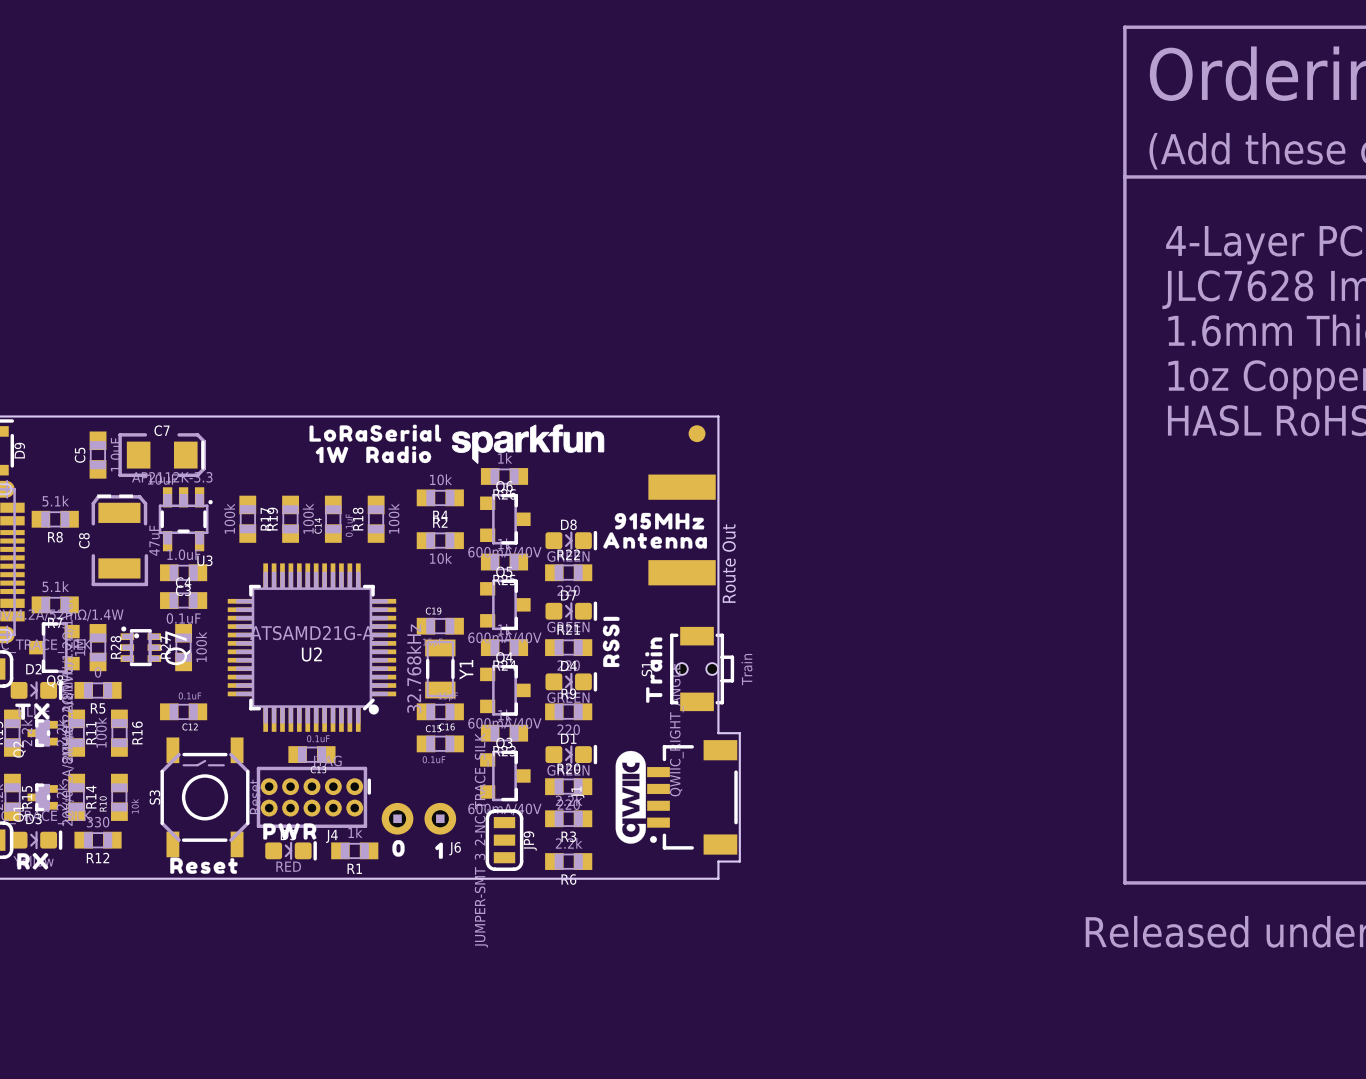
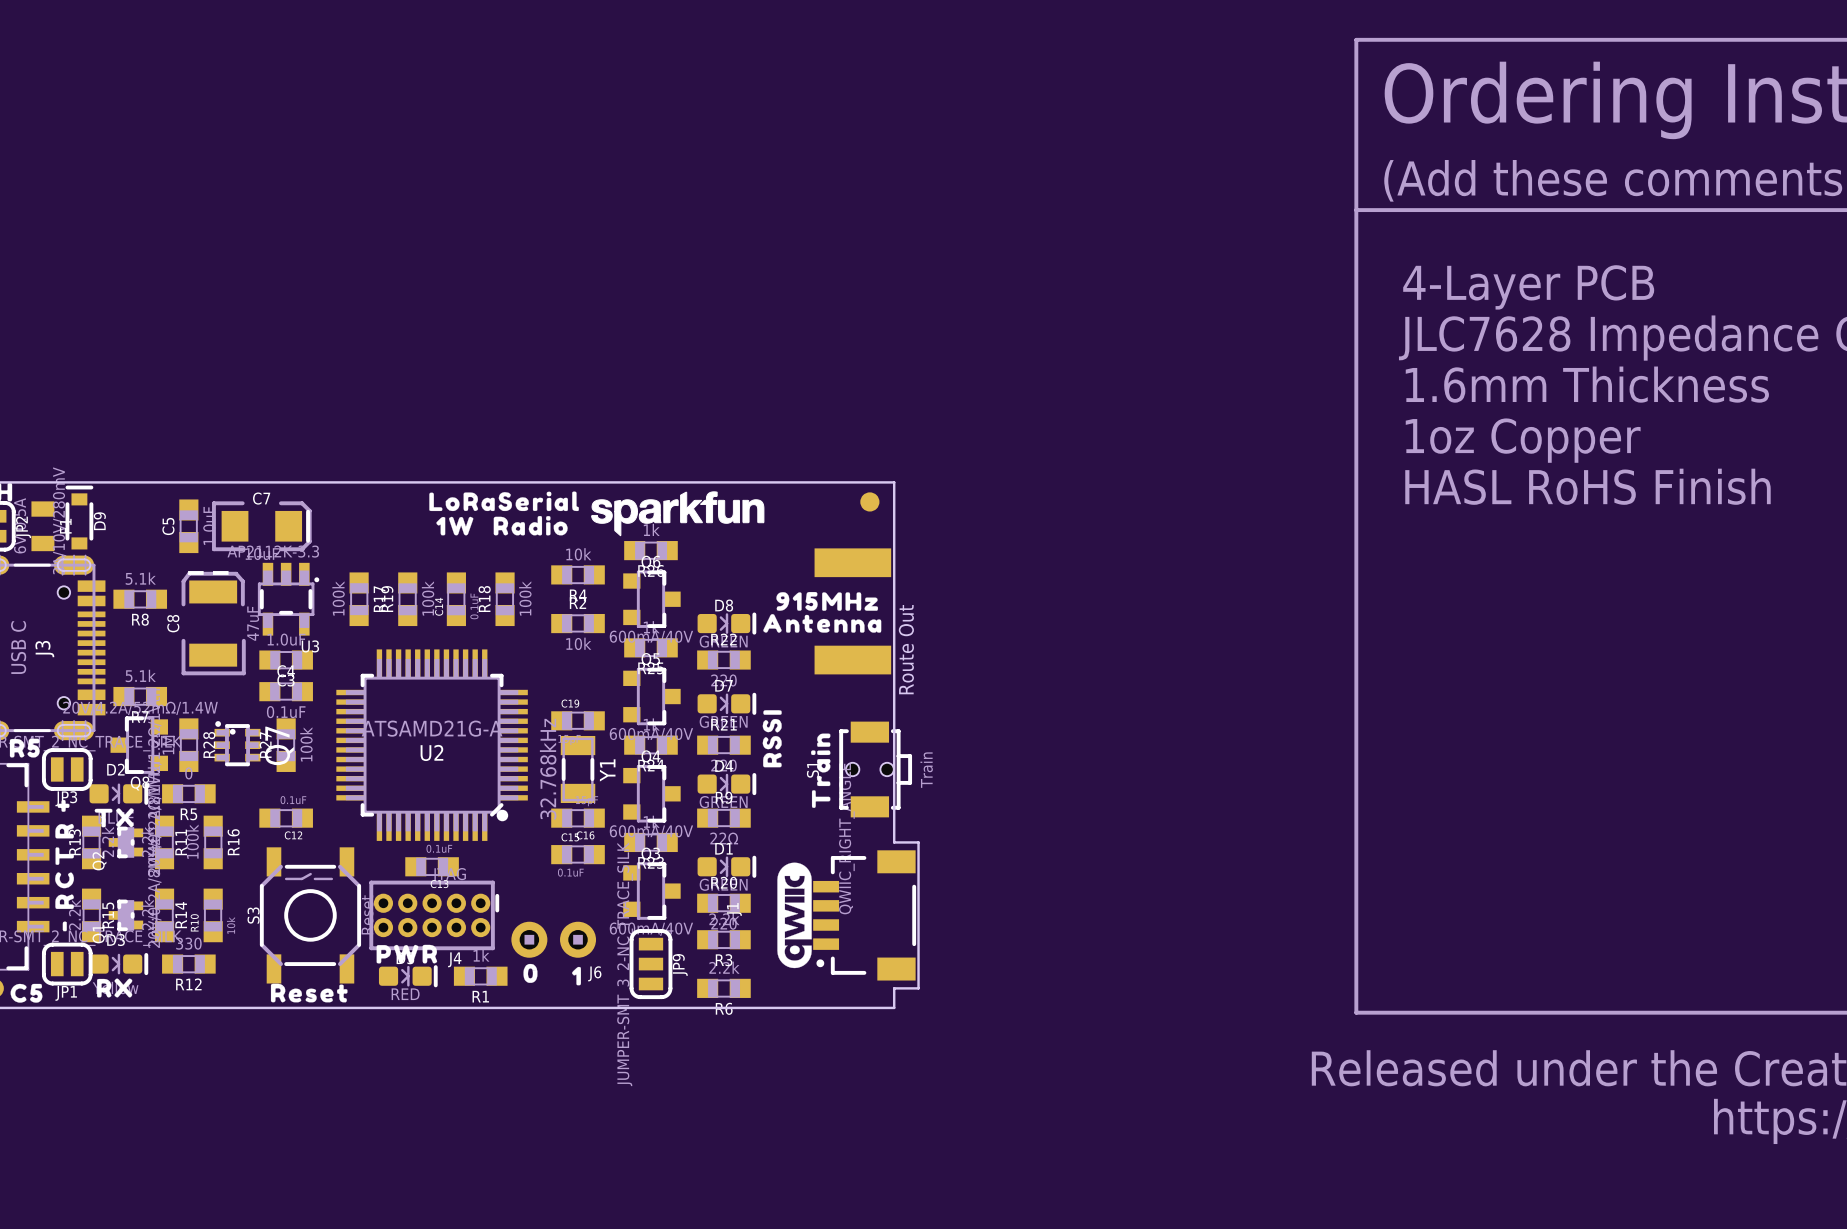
R9 value: 220 (568, 729) -> 22Ω (724, 838)

